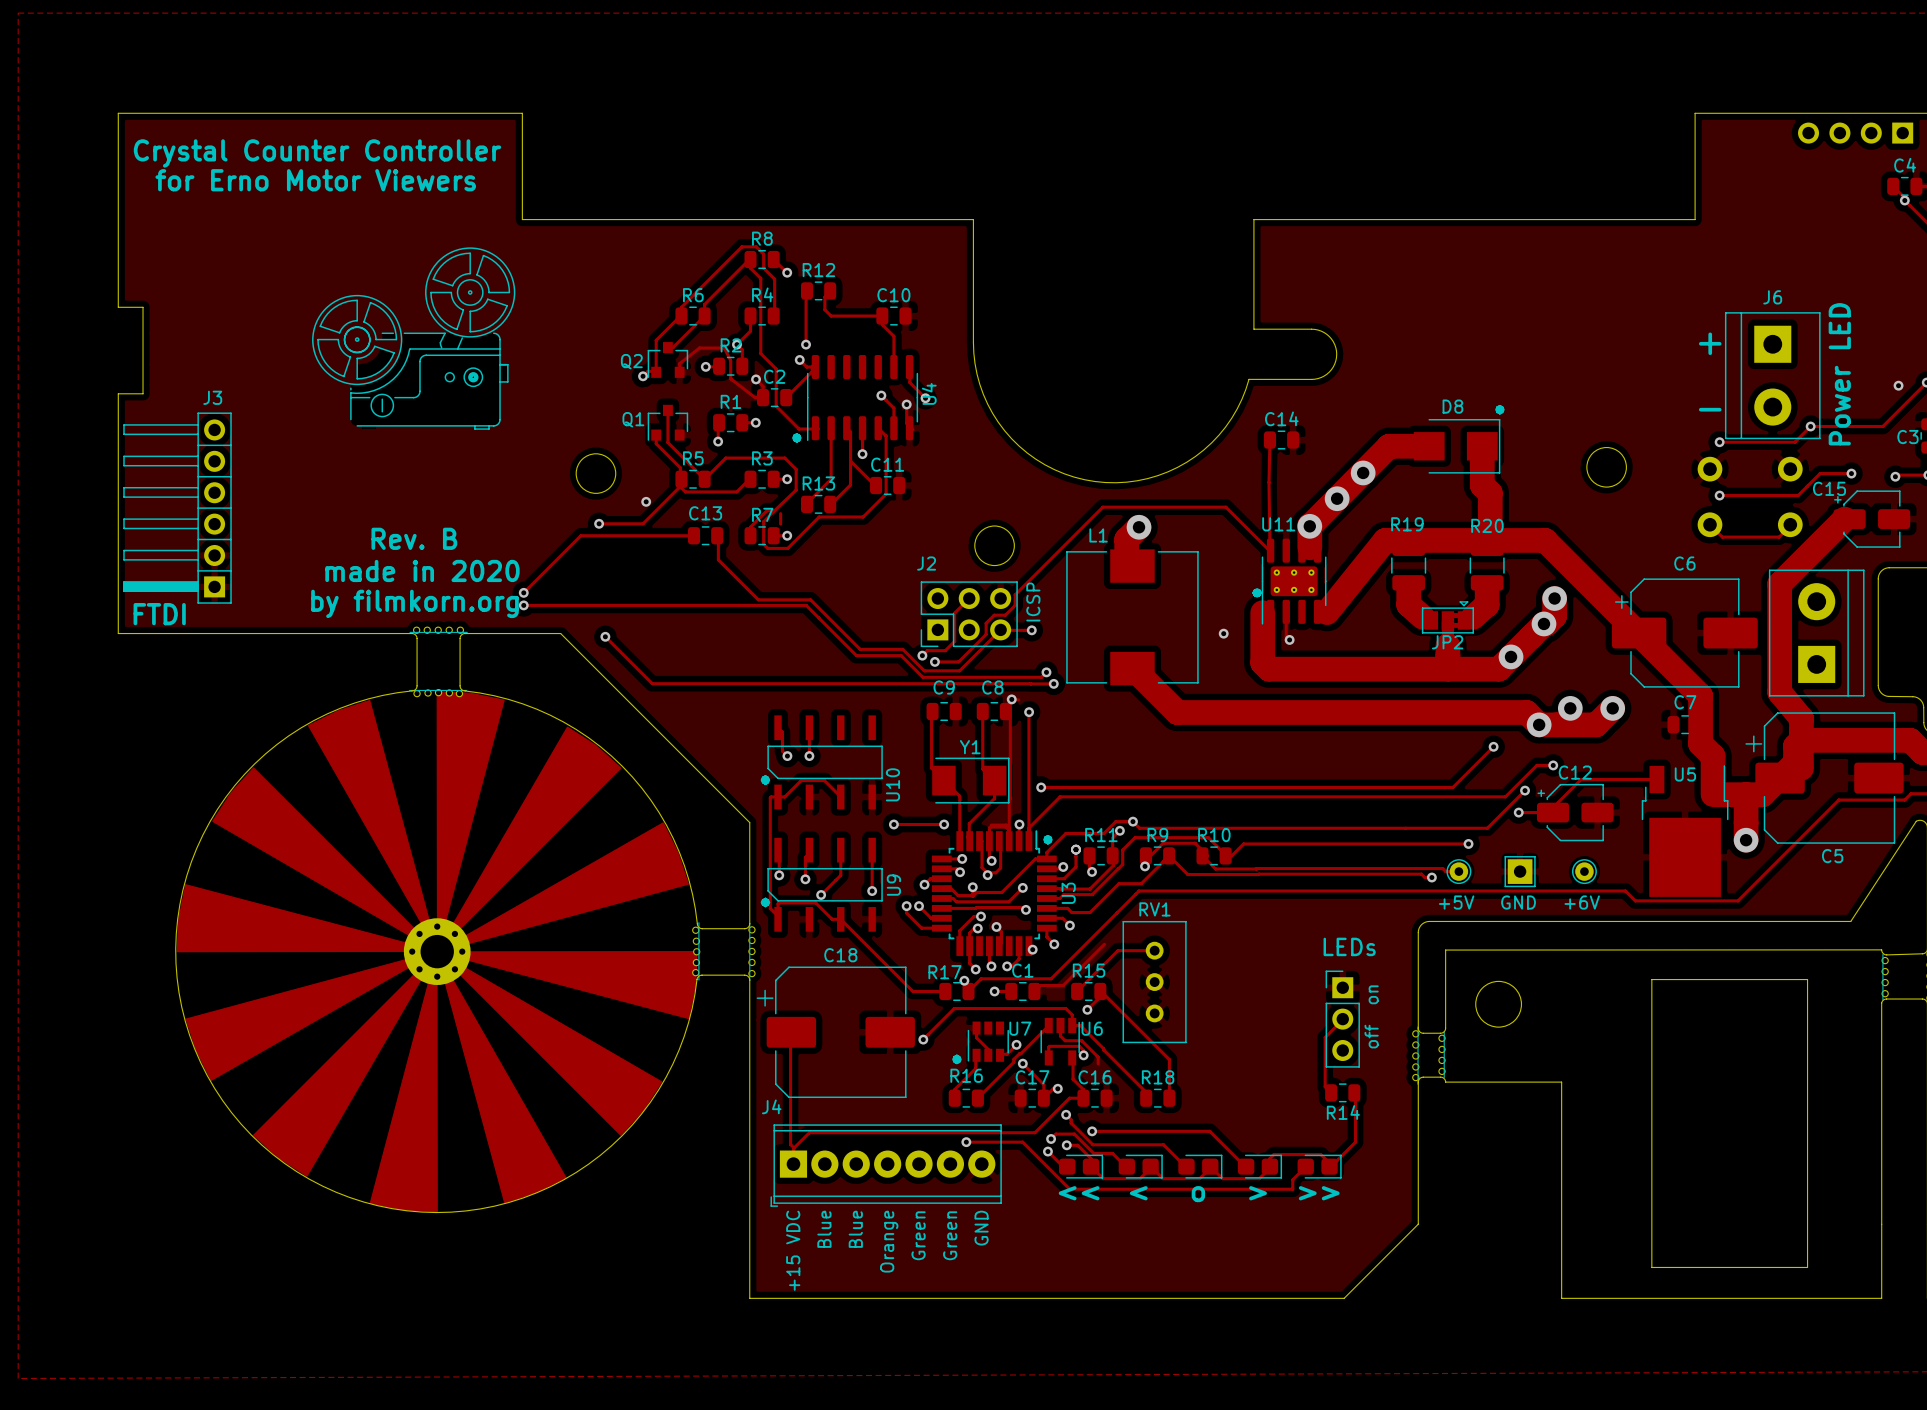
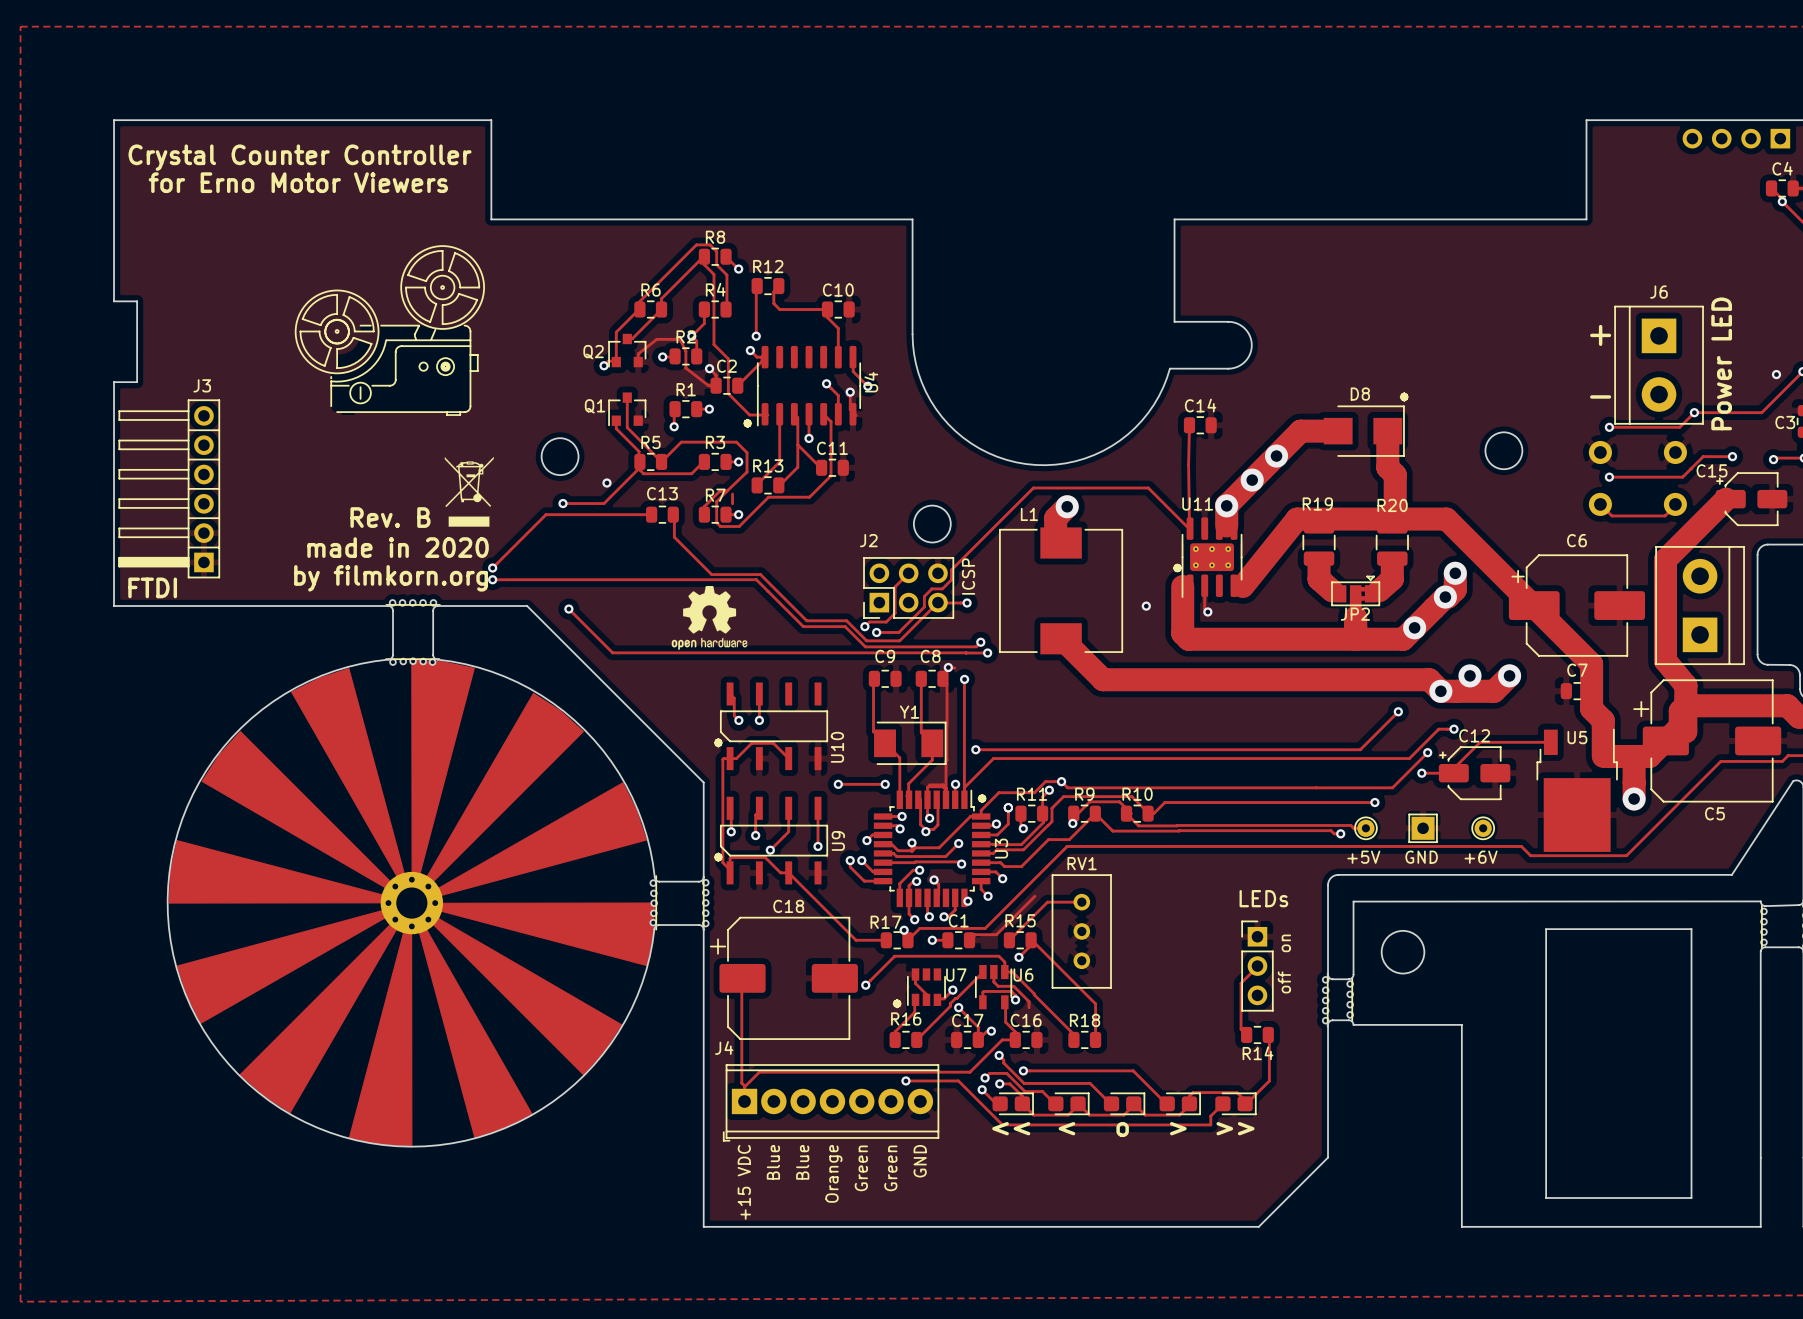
drawing: none -> [444, 456, 494, 527]
drawing: none -> [671, 585, 748, 650]

